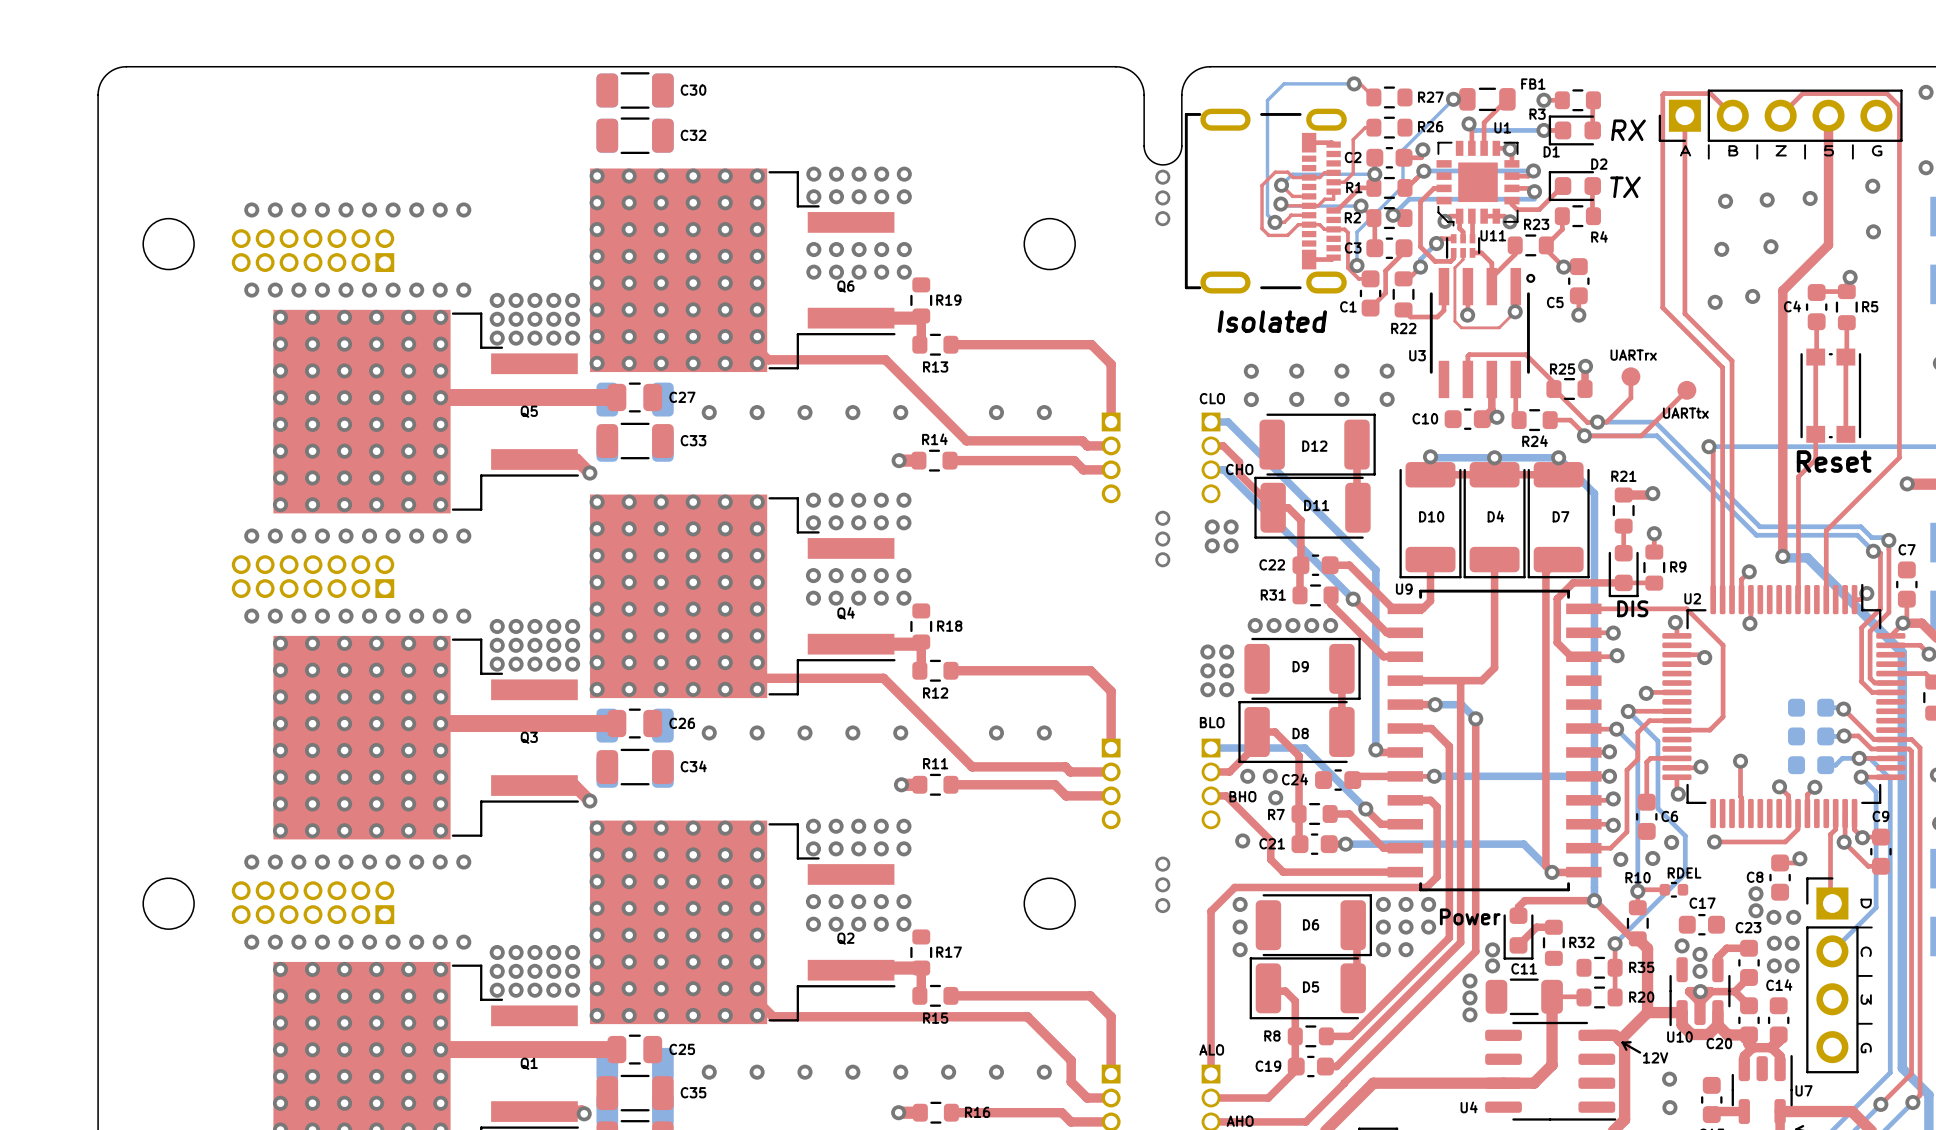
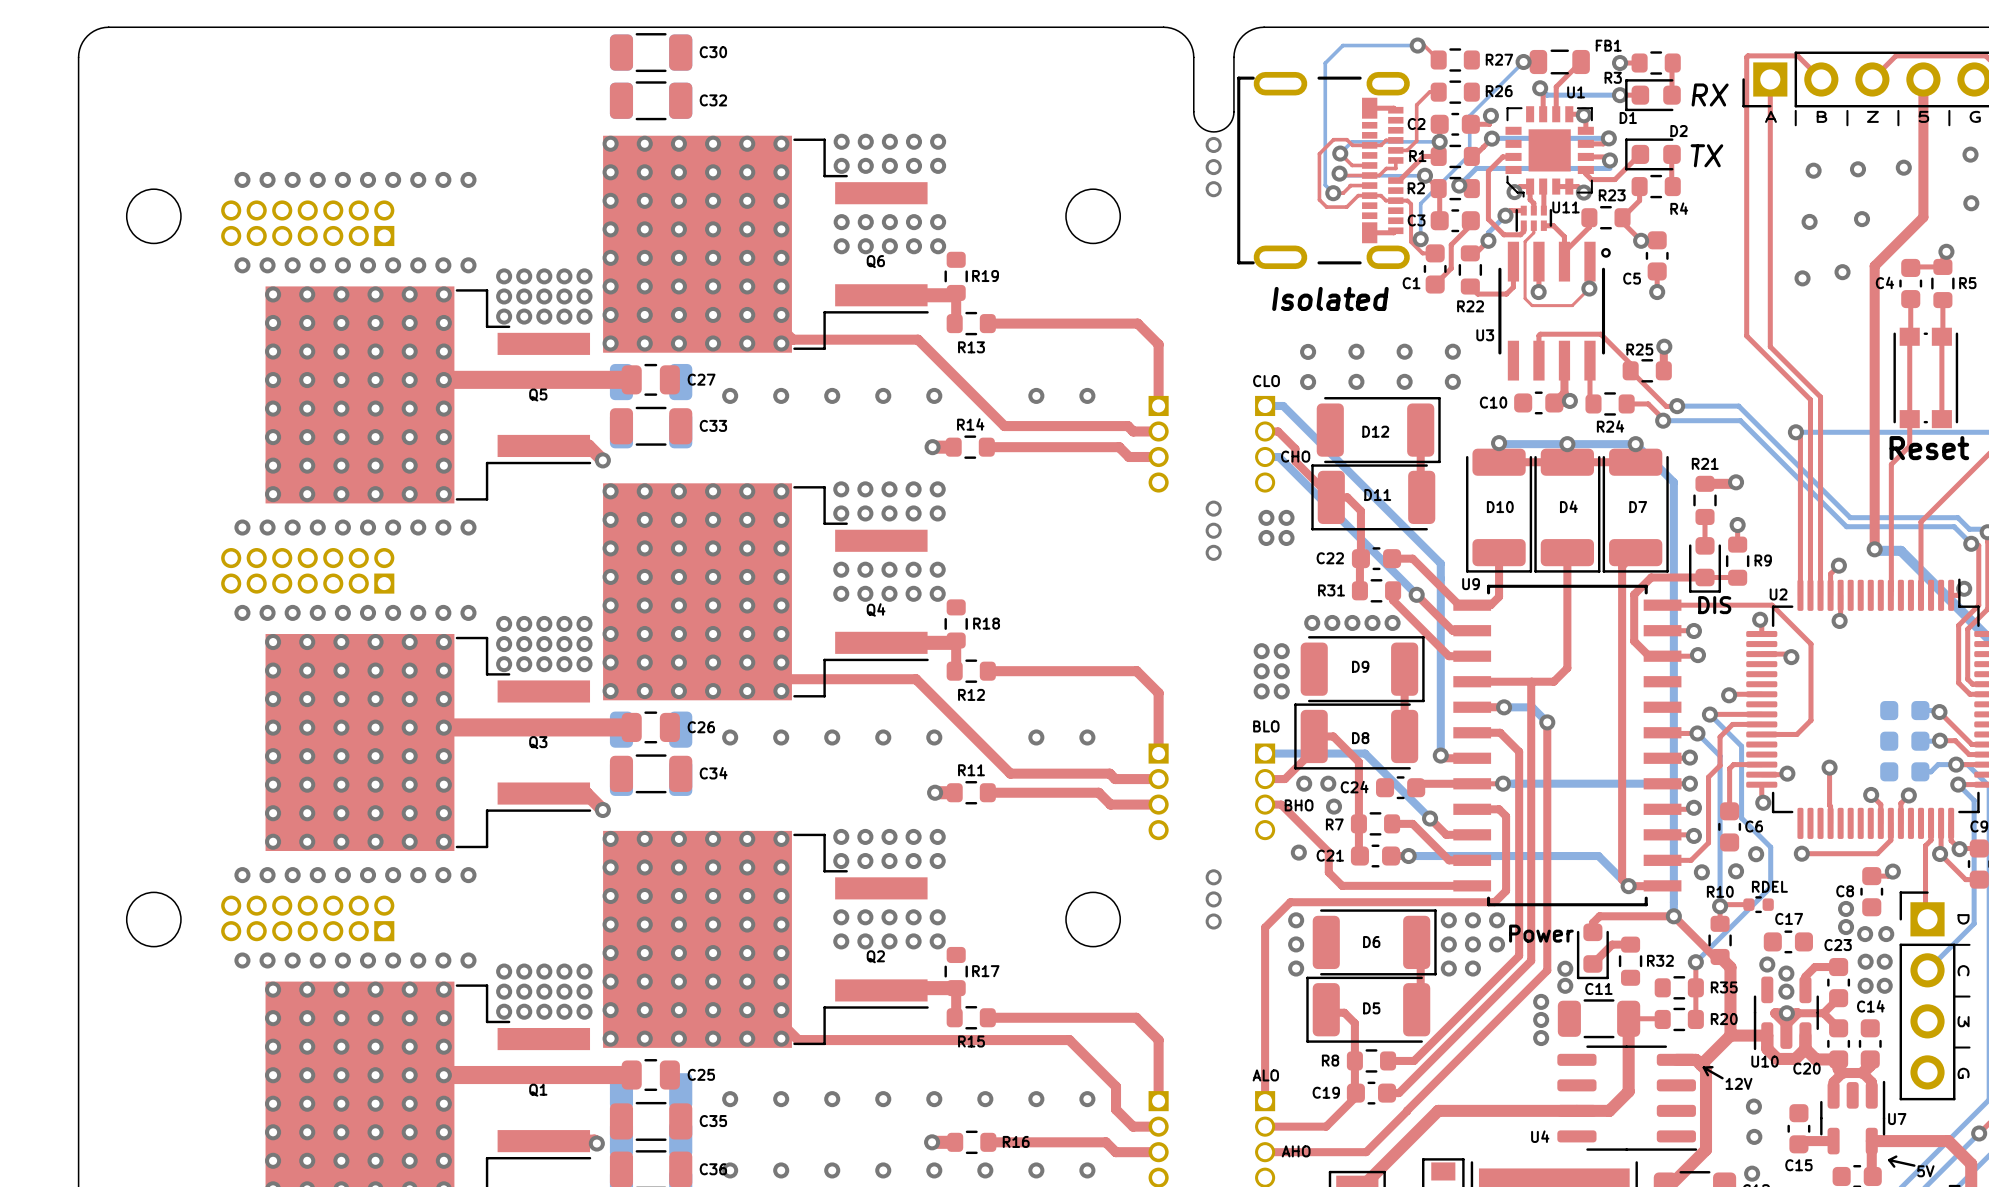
top track: (1662, 307) (1722, 367) (1722, 416) -> (1746, 284) (1746, 335) (1810, 399)
top track: (1684, 313) (1732, 360) (1732, 413) -> (1770, 290) (1770, 346) (1820, 397)
top track: (1630, 376) (1630, 397) (1606, 422) (1597, 422) -> none
UARTrx: (1630, 376) -> none
top track: (1686, 390) (1641, 435) (1584, 435) -> none
UARTtx: (1686, 390) -> none

